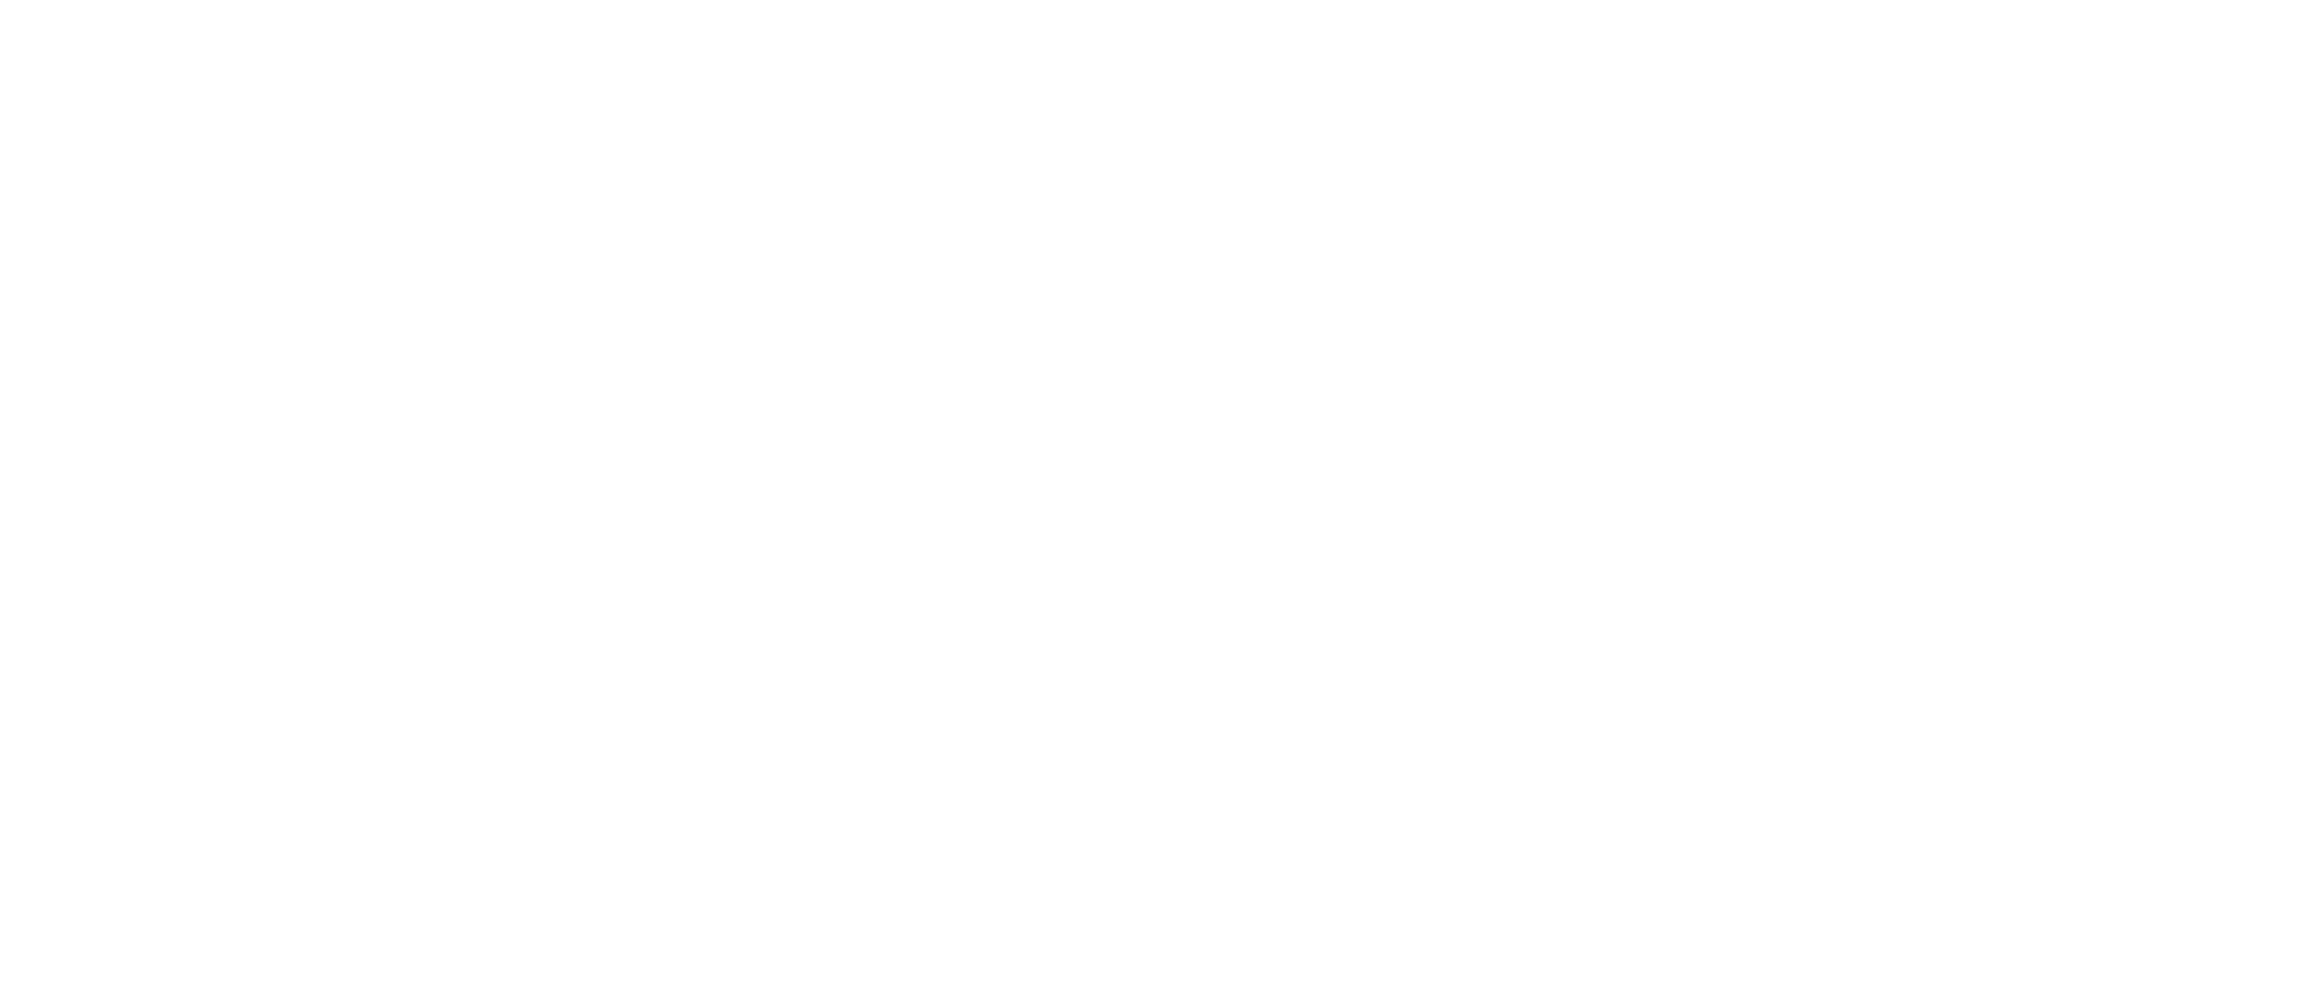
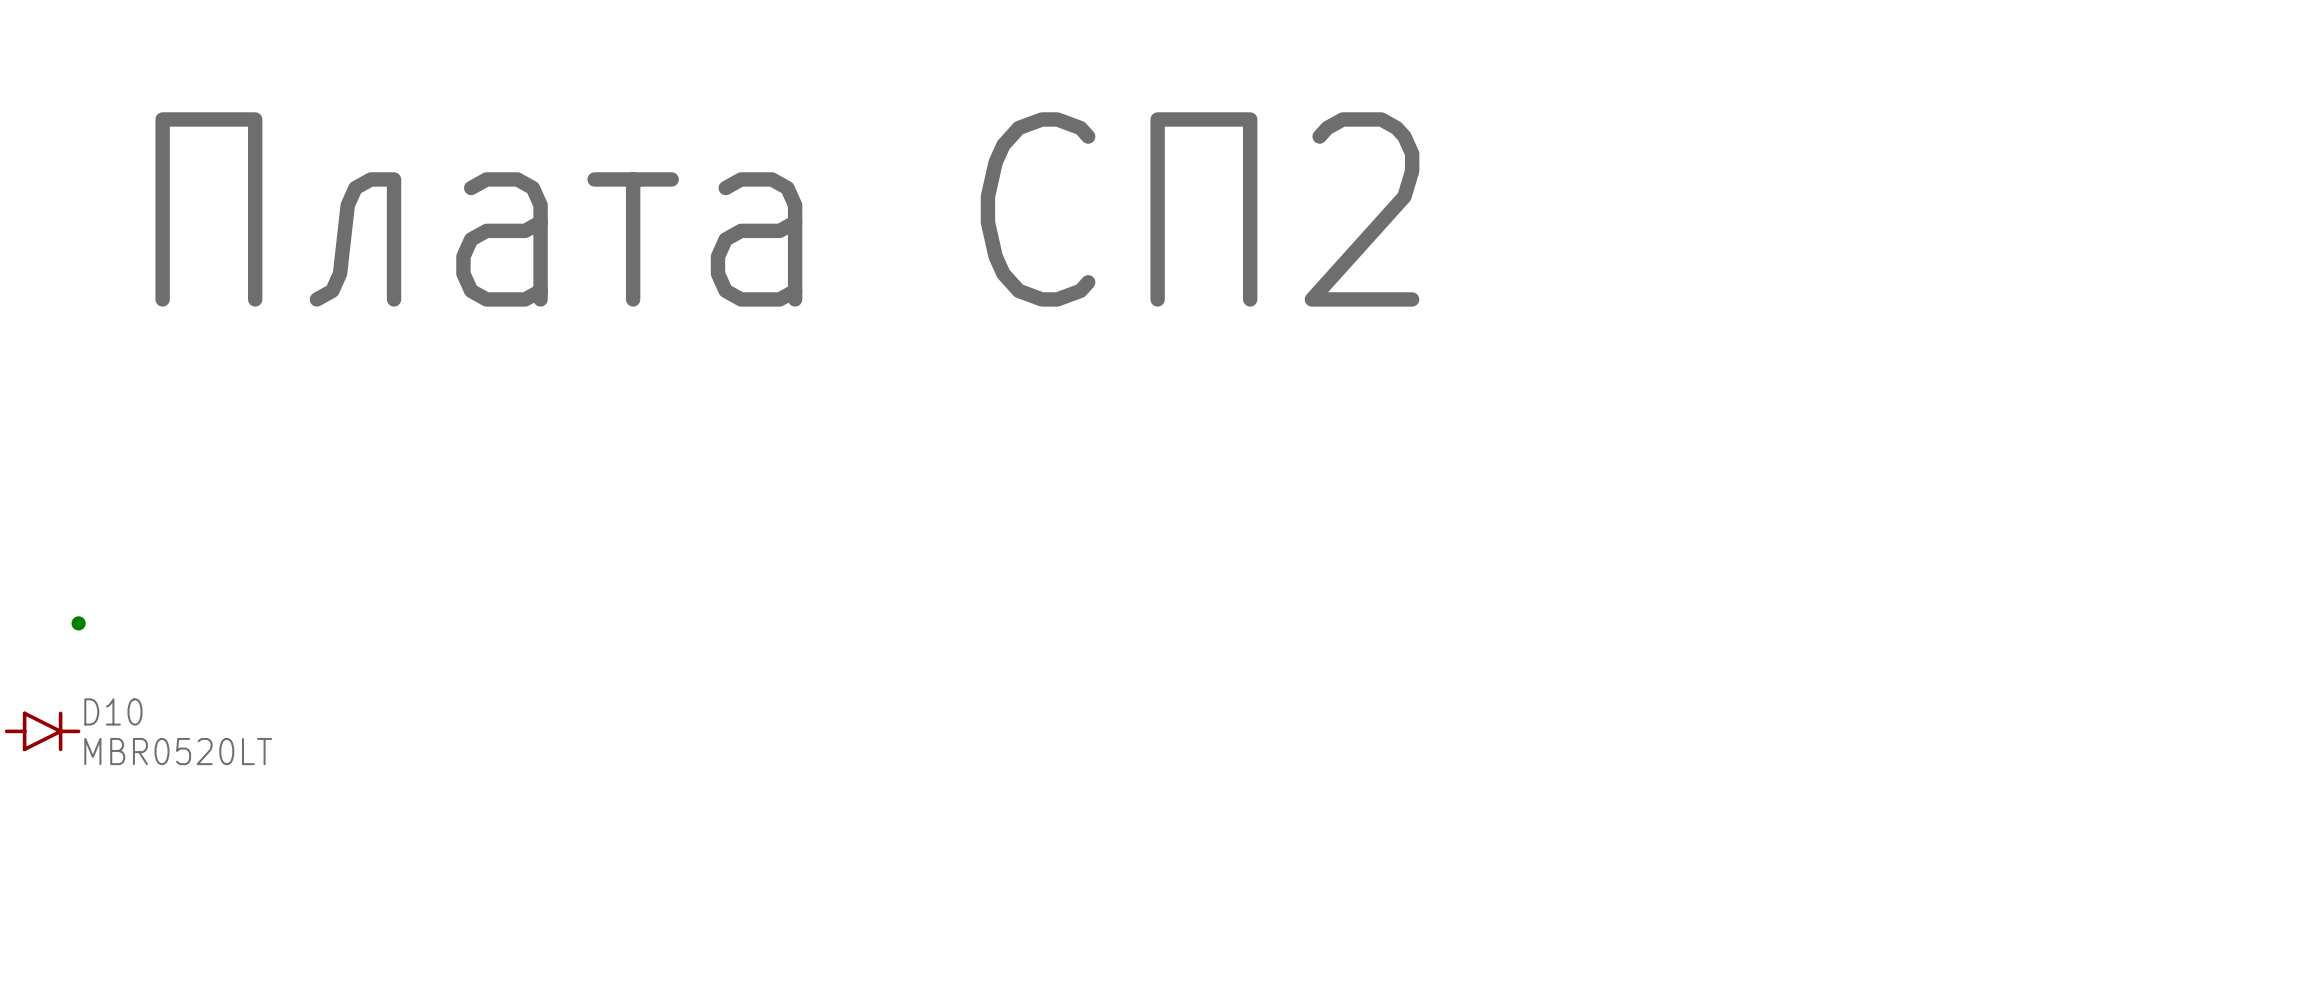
part: none -> Плата СП2 (787, 209)
junction: none -> (78, 623)
D10: none -> MBR0520LT (42, 731)

